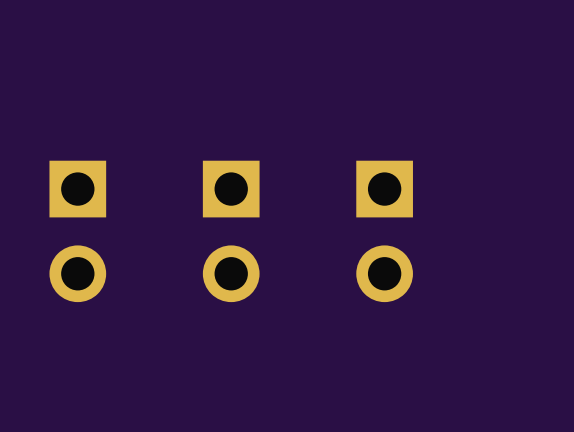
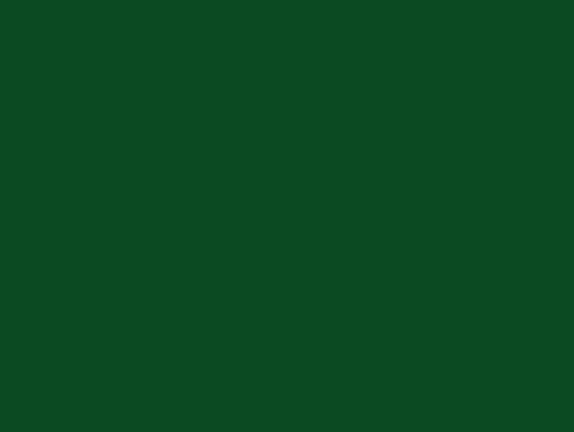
part: (77, 231) -> none
part: (231, 231) -> none
part: (384, 231) -> none

